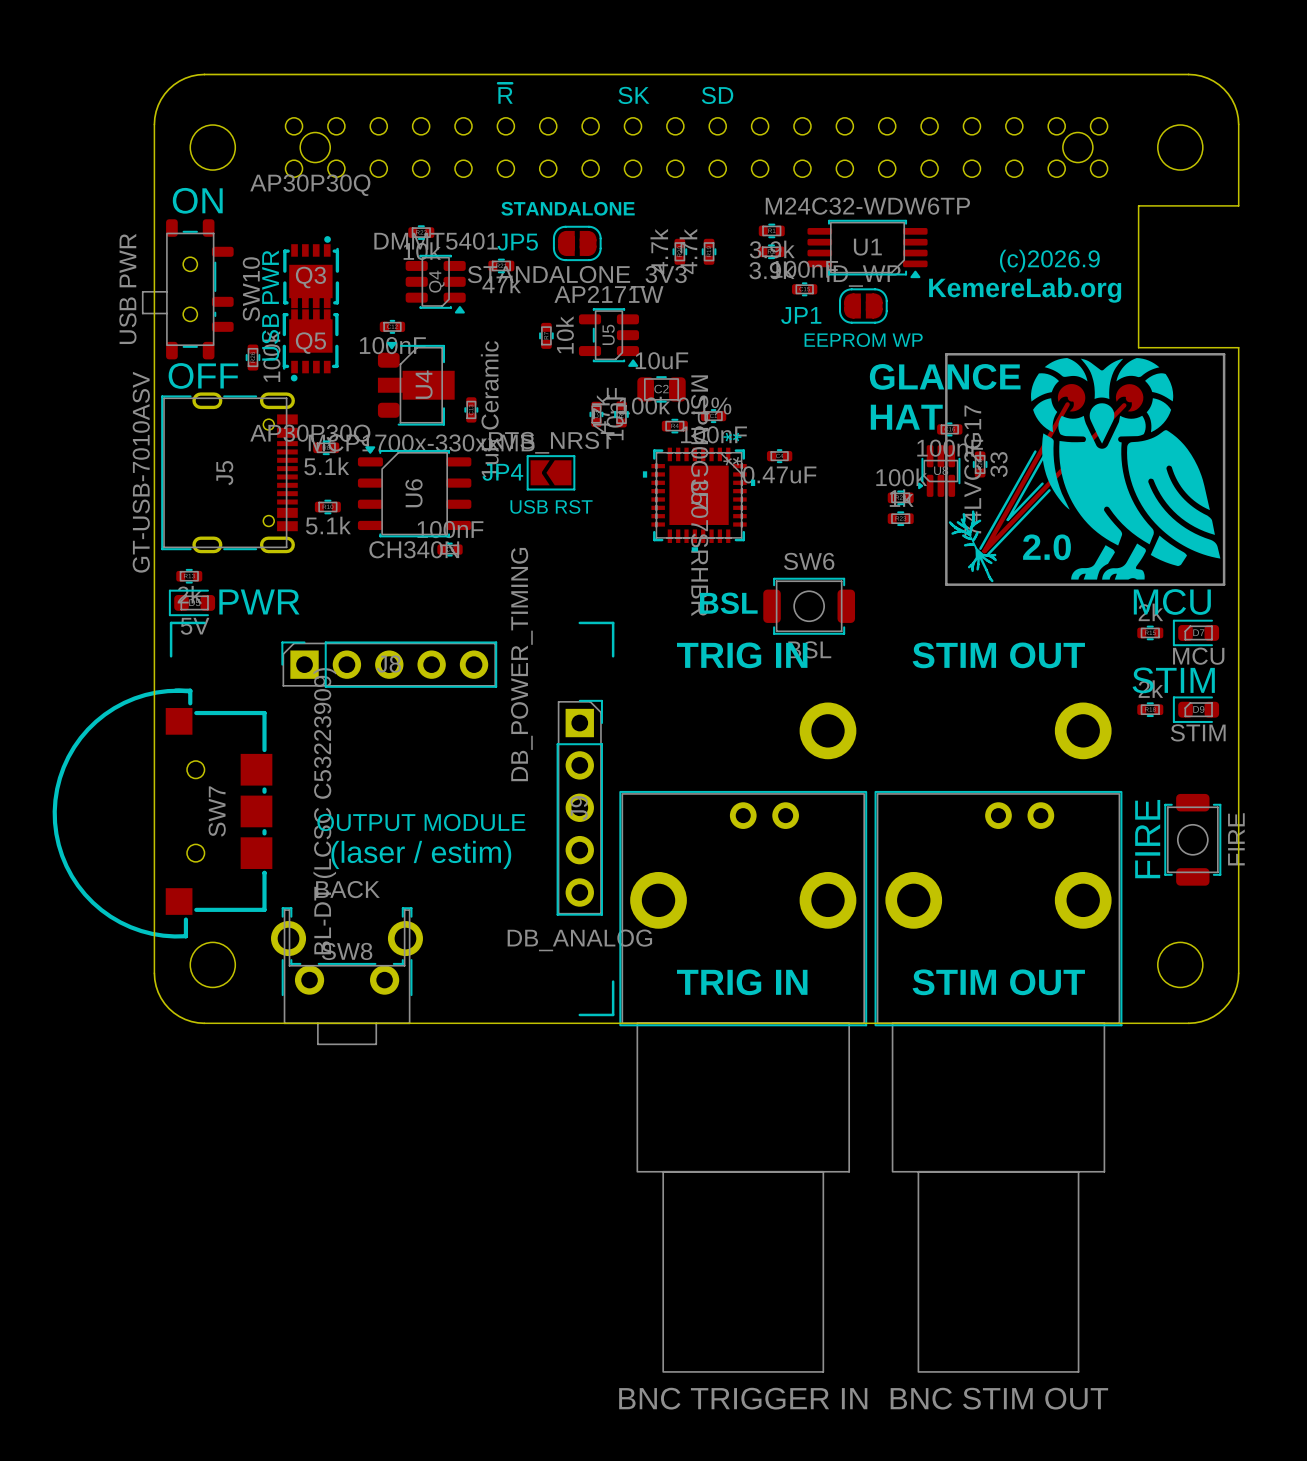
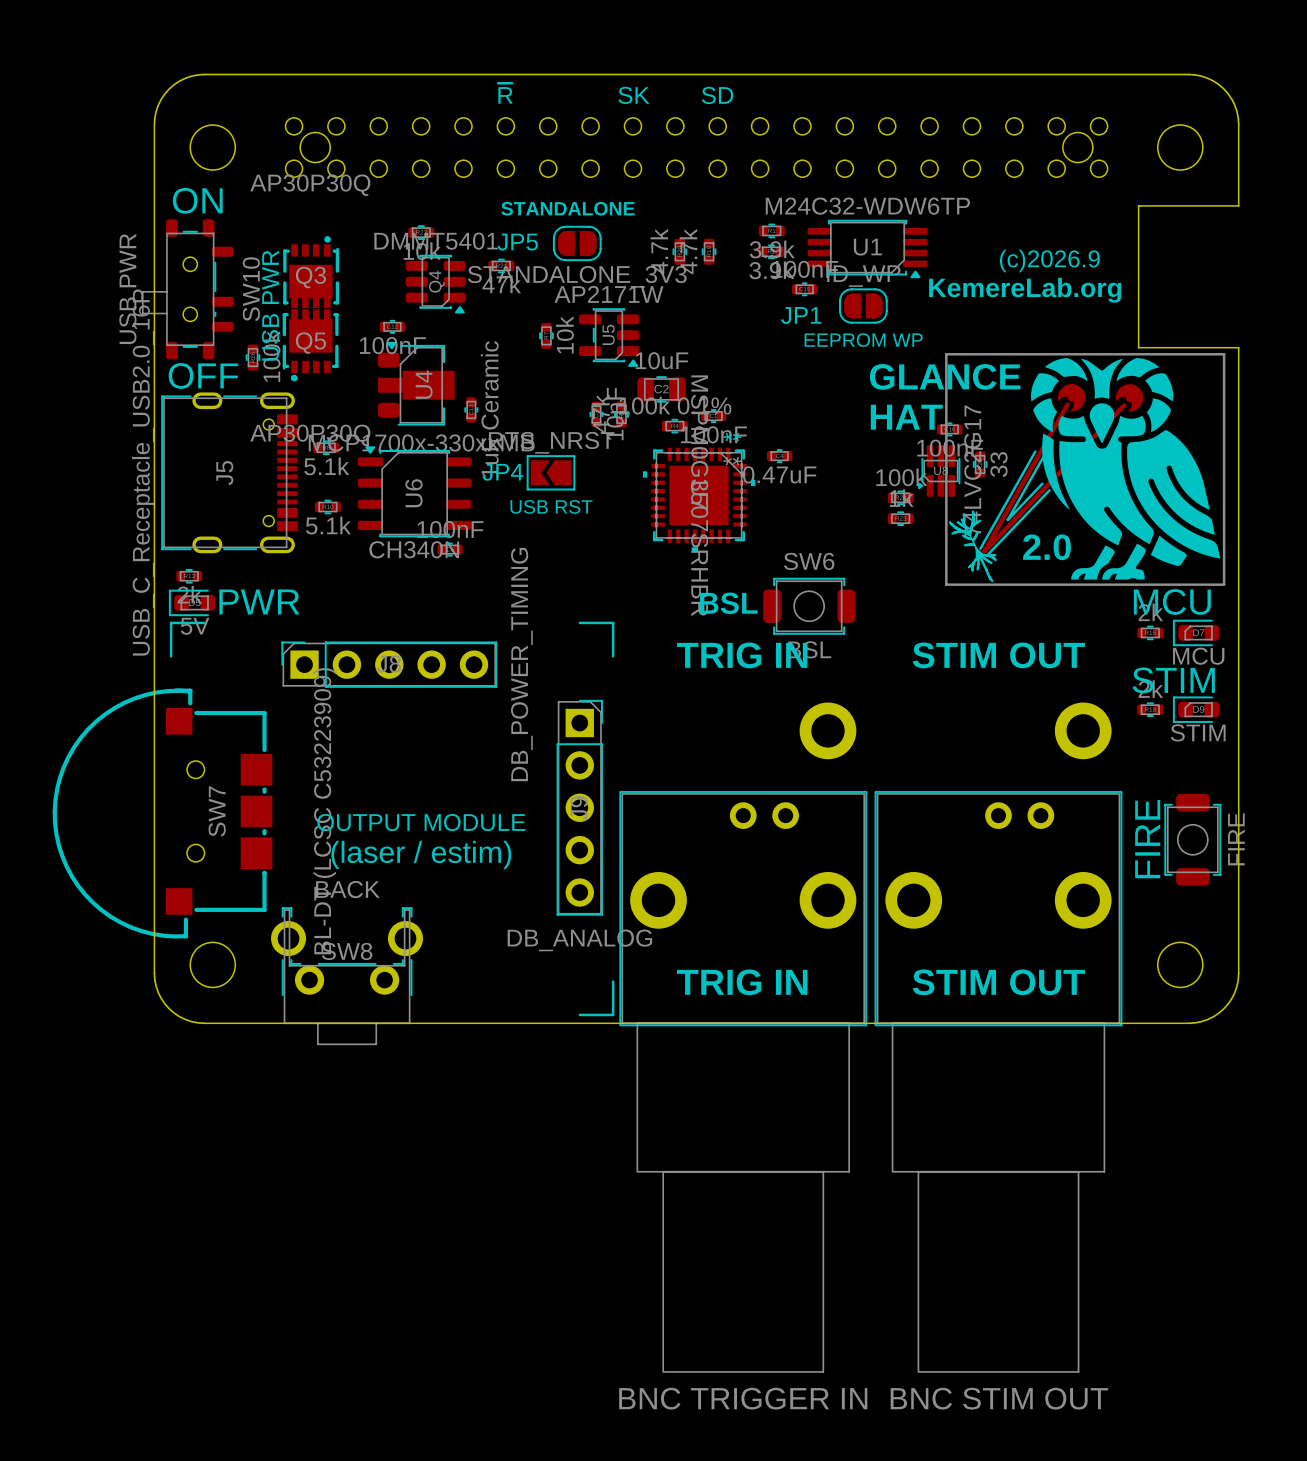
J5 value: GT-USB-7010ASV (141, 472) -> USB_C_Receptacle_USB2.0_16P (143, 472)

